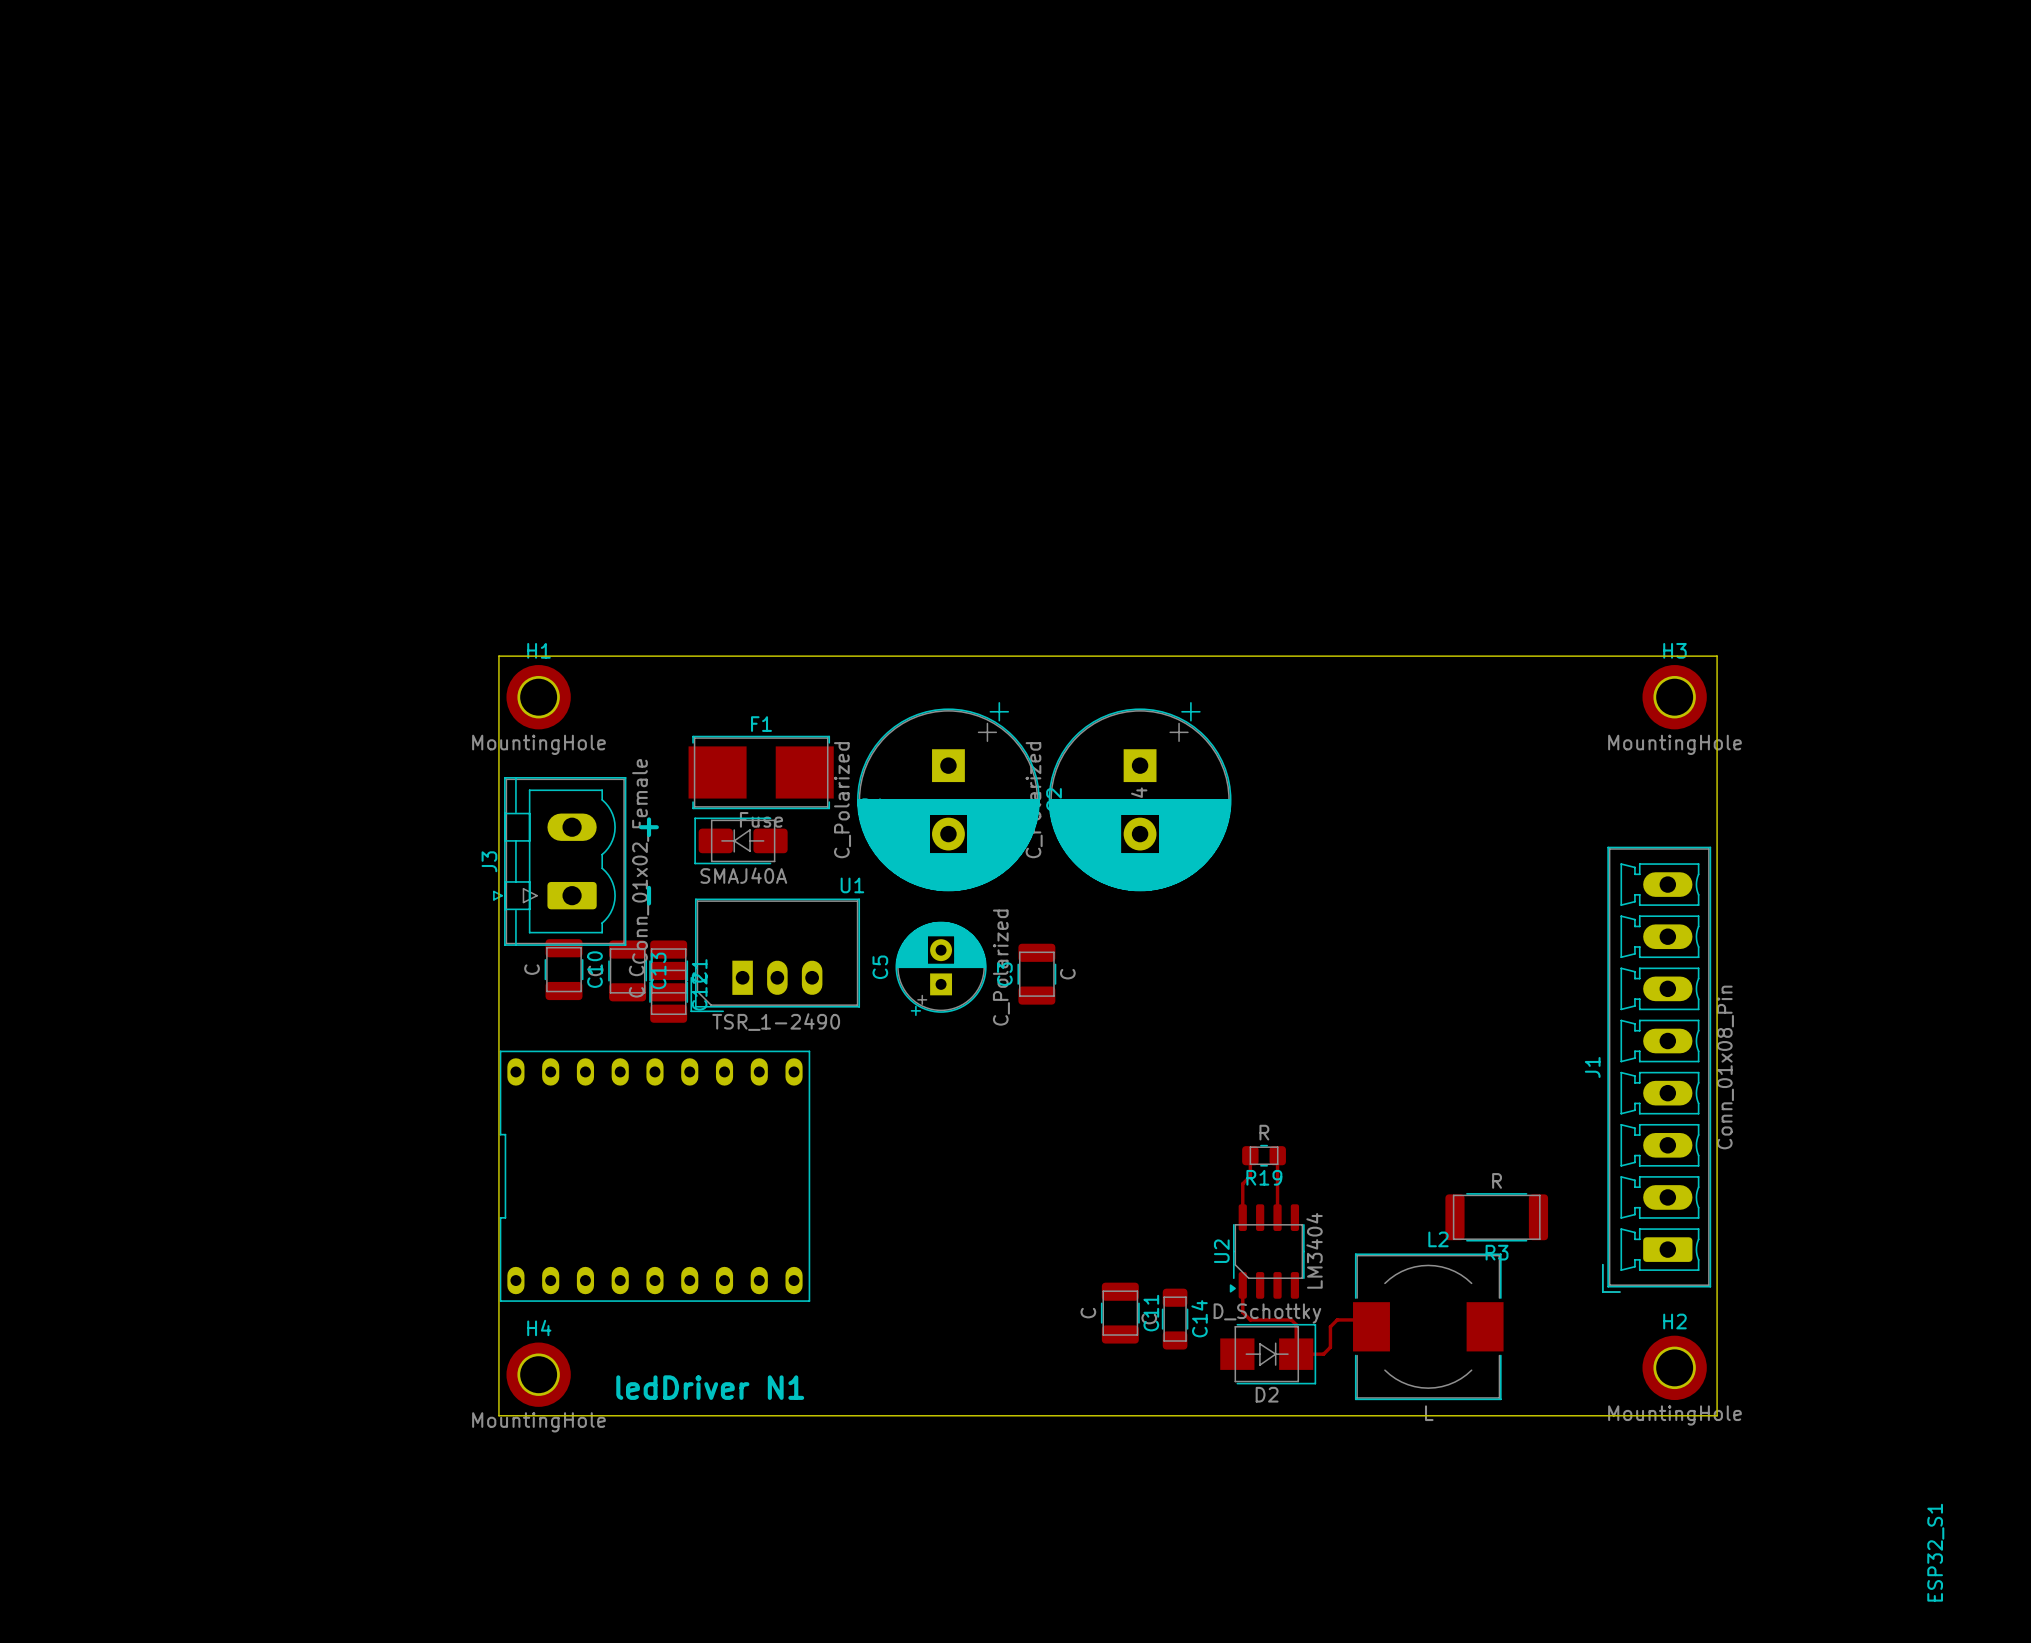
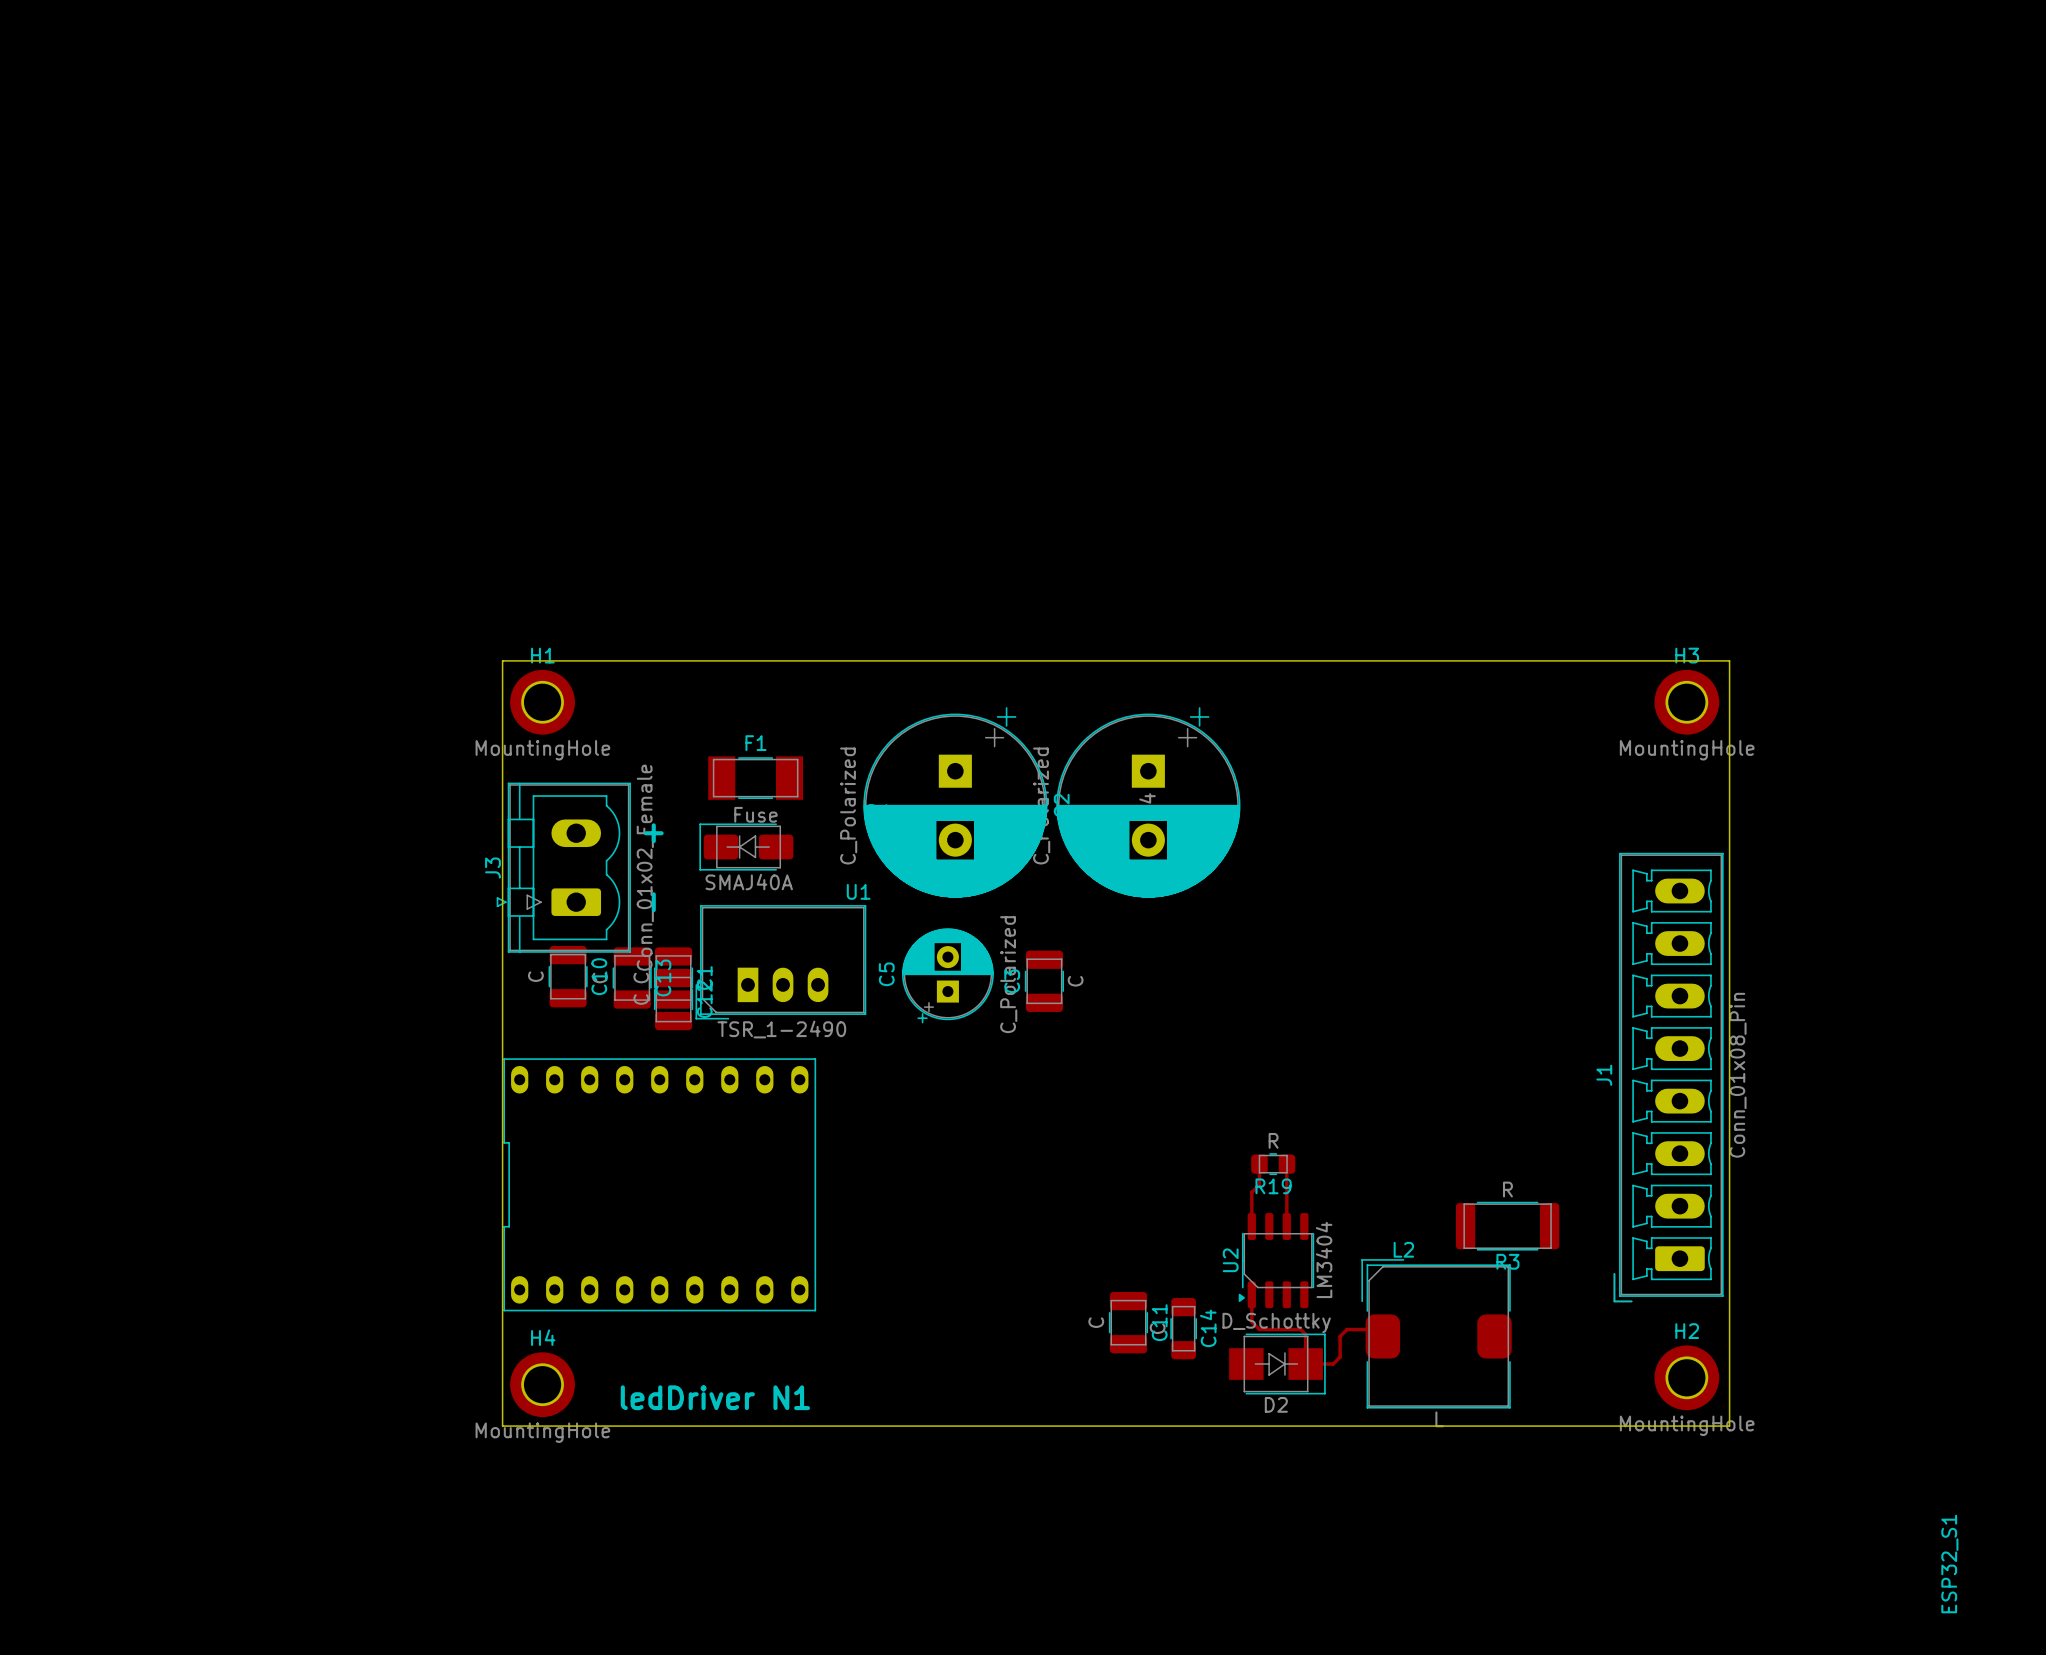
F1 footprint: [688, 735, 834, 810] -> [708, 756, 803, 800]
L2 name position: L2 (1438, 1239) -> L2 (1403, 1249)
L2 footprint: [1353, 1253, 1504, 1401] -> [1361, 1259, 1512, 1409]

